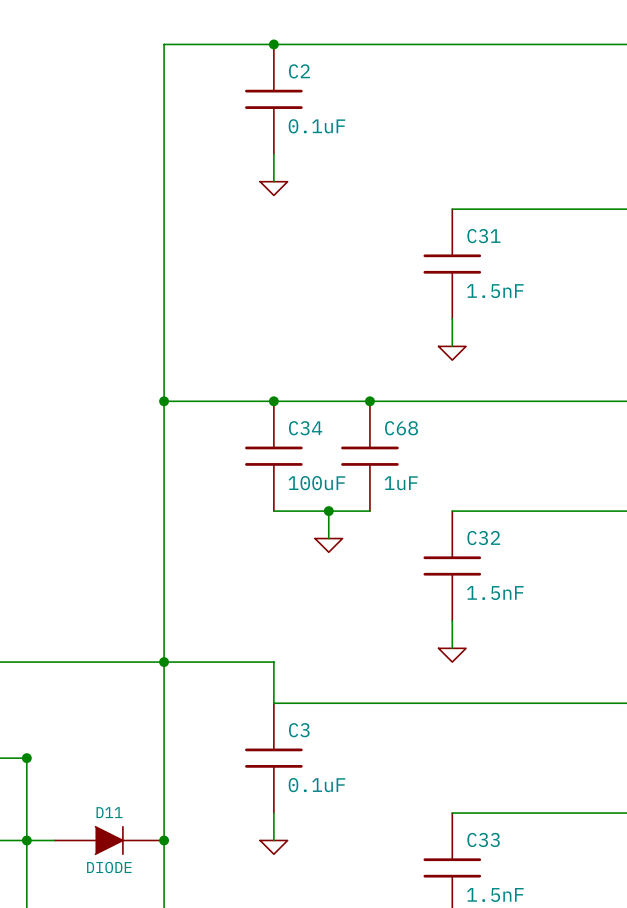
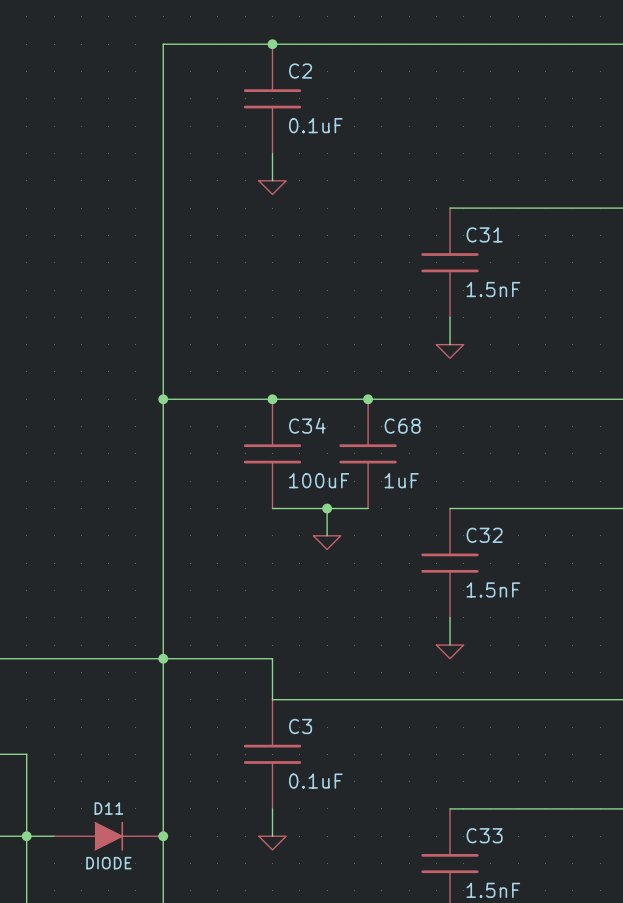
junction: (26, 758) -> none

